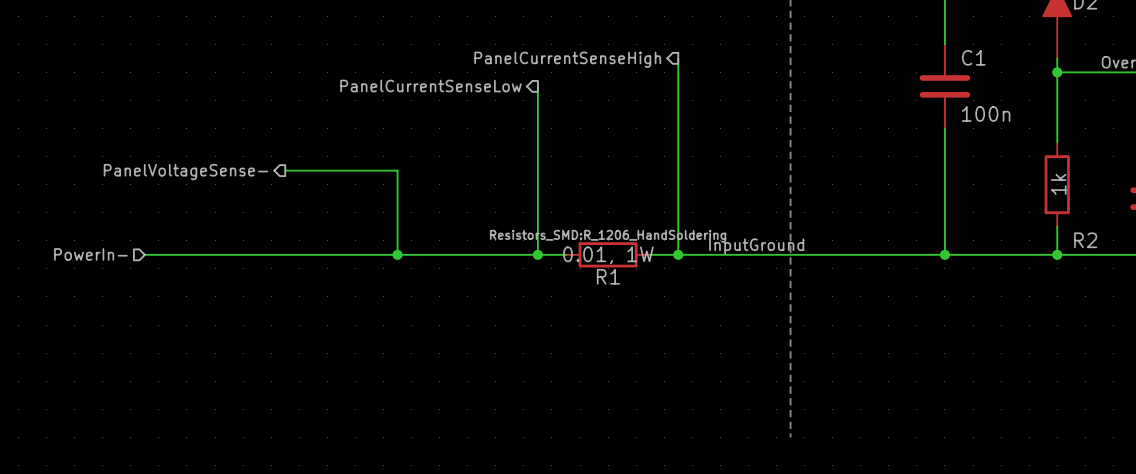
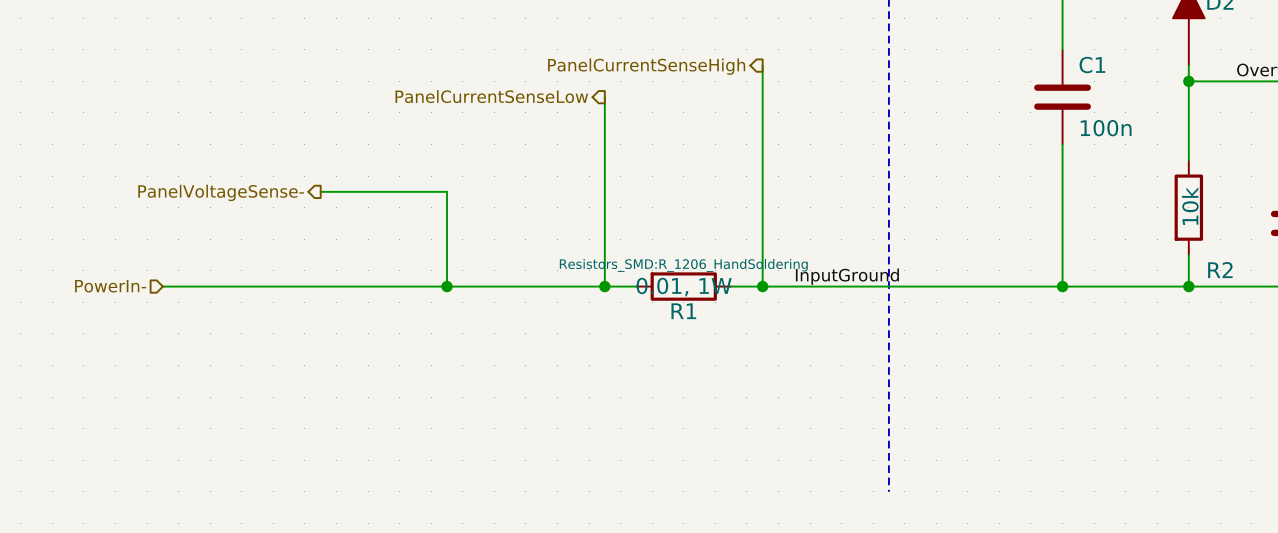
R2 value: 1k (1058, 184) -> 10k (1190, 206)

